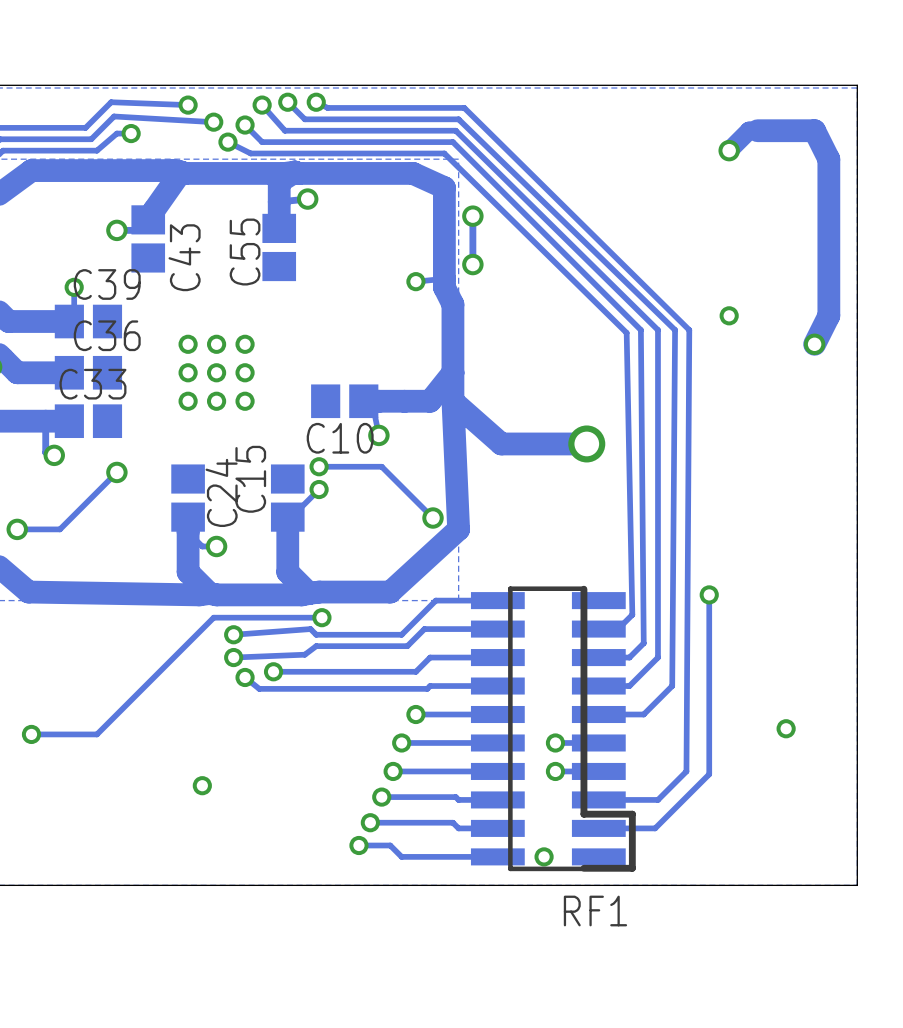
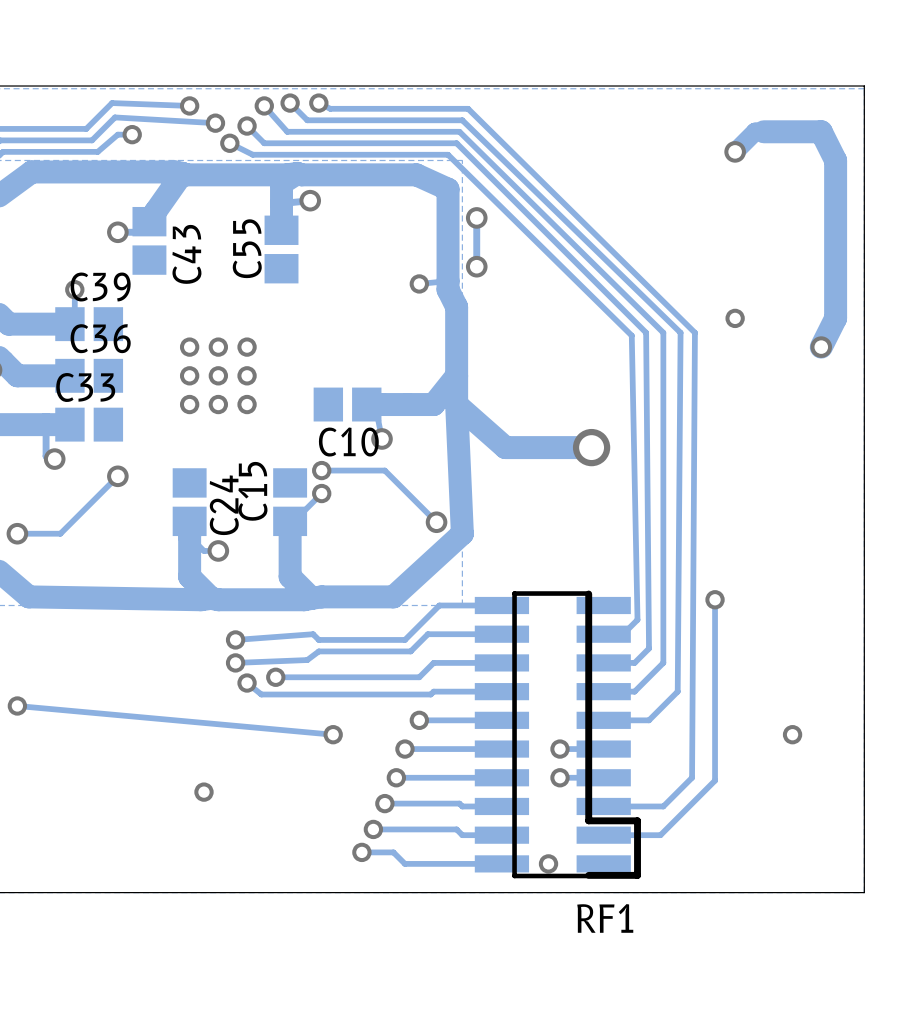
track: (321, 617) (213, 617) (96, 734) (31, 734) -> none
via position: (321, 617) -> (333, 734)
track: none -> (17, 705) (333, 734)
via: none -> (17, 705)
via: (31, 734) -> none

